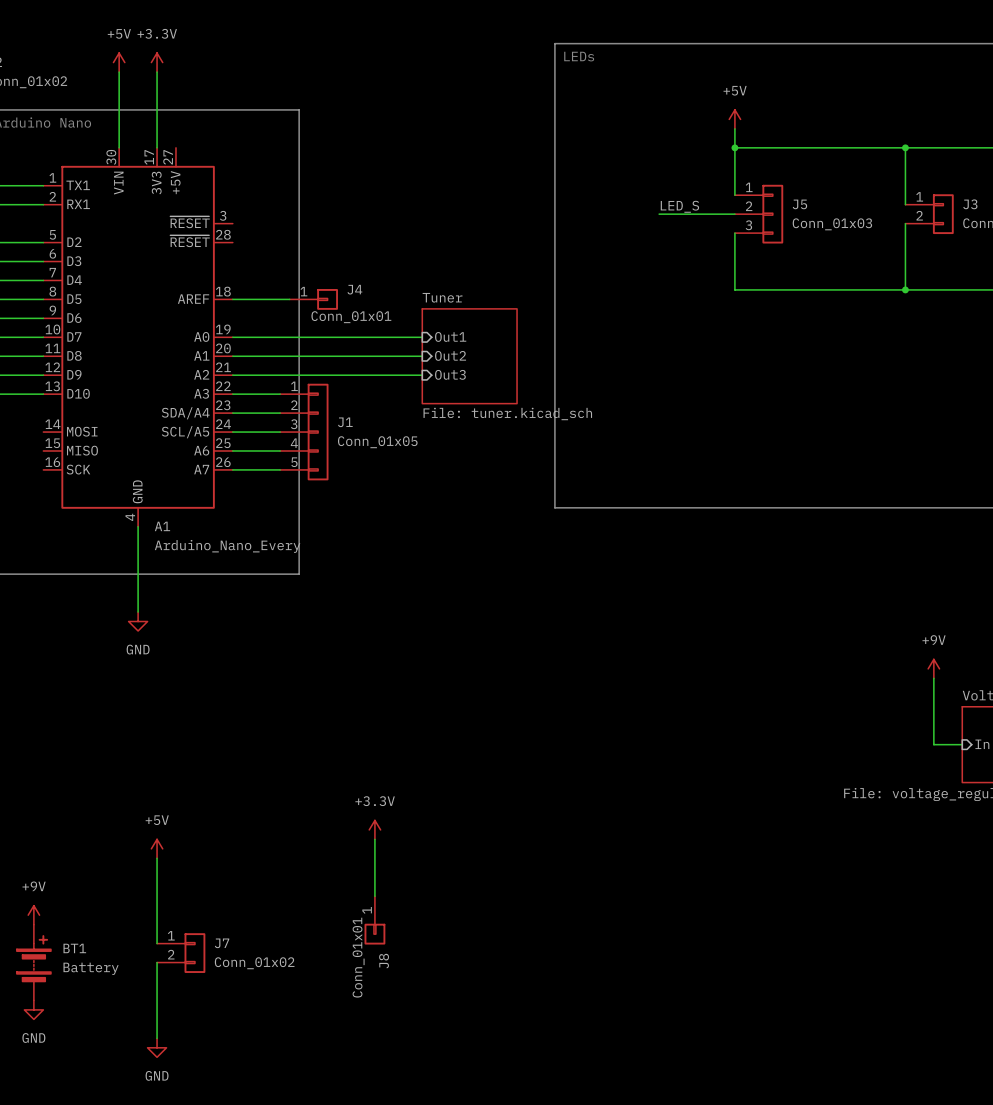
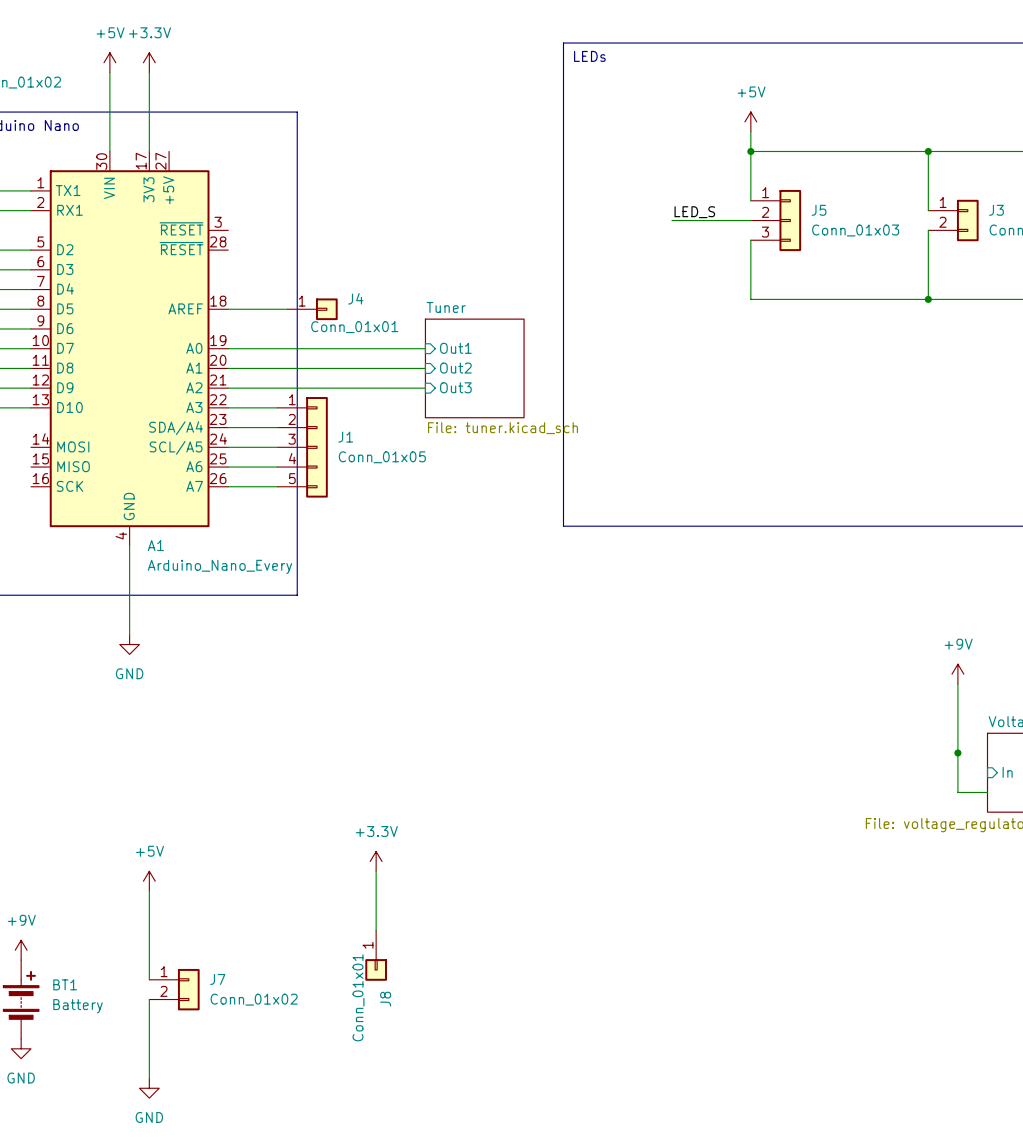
power symbol position: +9V (933, 668) -> +9V (957, 674)
junction: none -> (957, 753)
wire: (933, 744) (962, 744) -> (957, 772) (957, 792) (987, 792)

